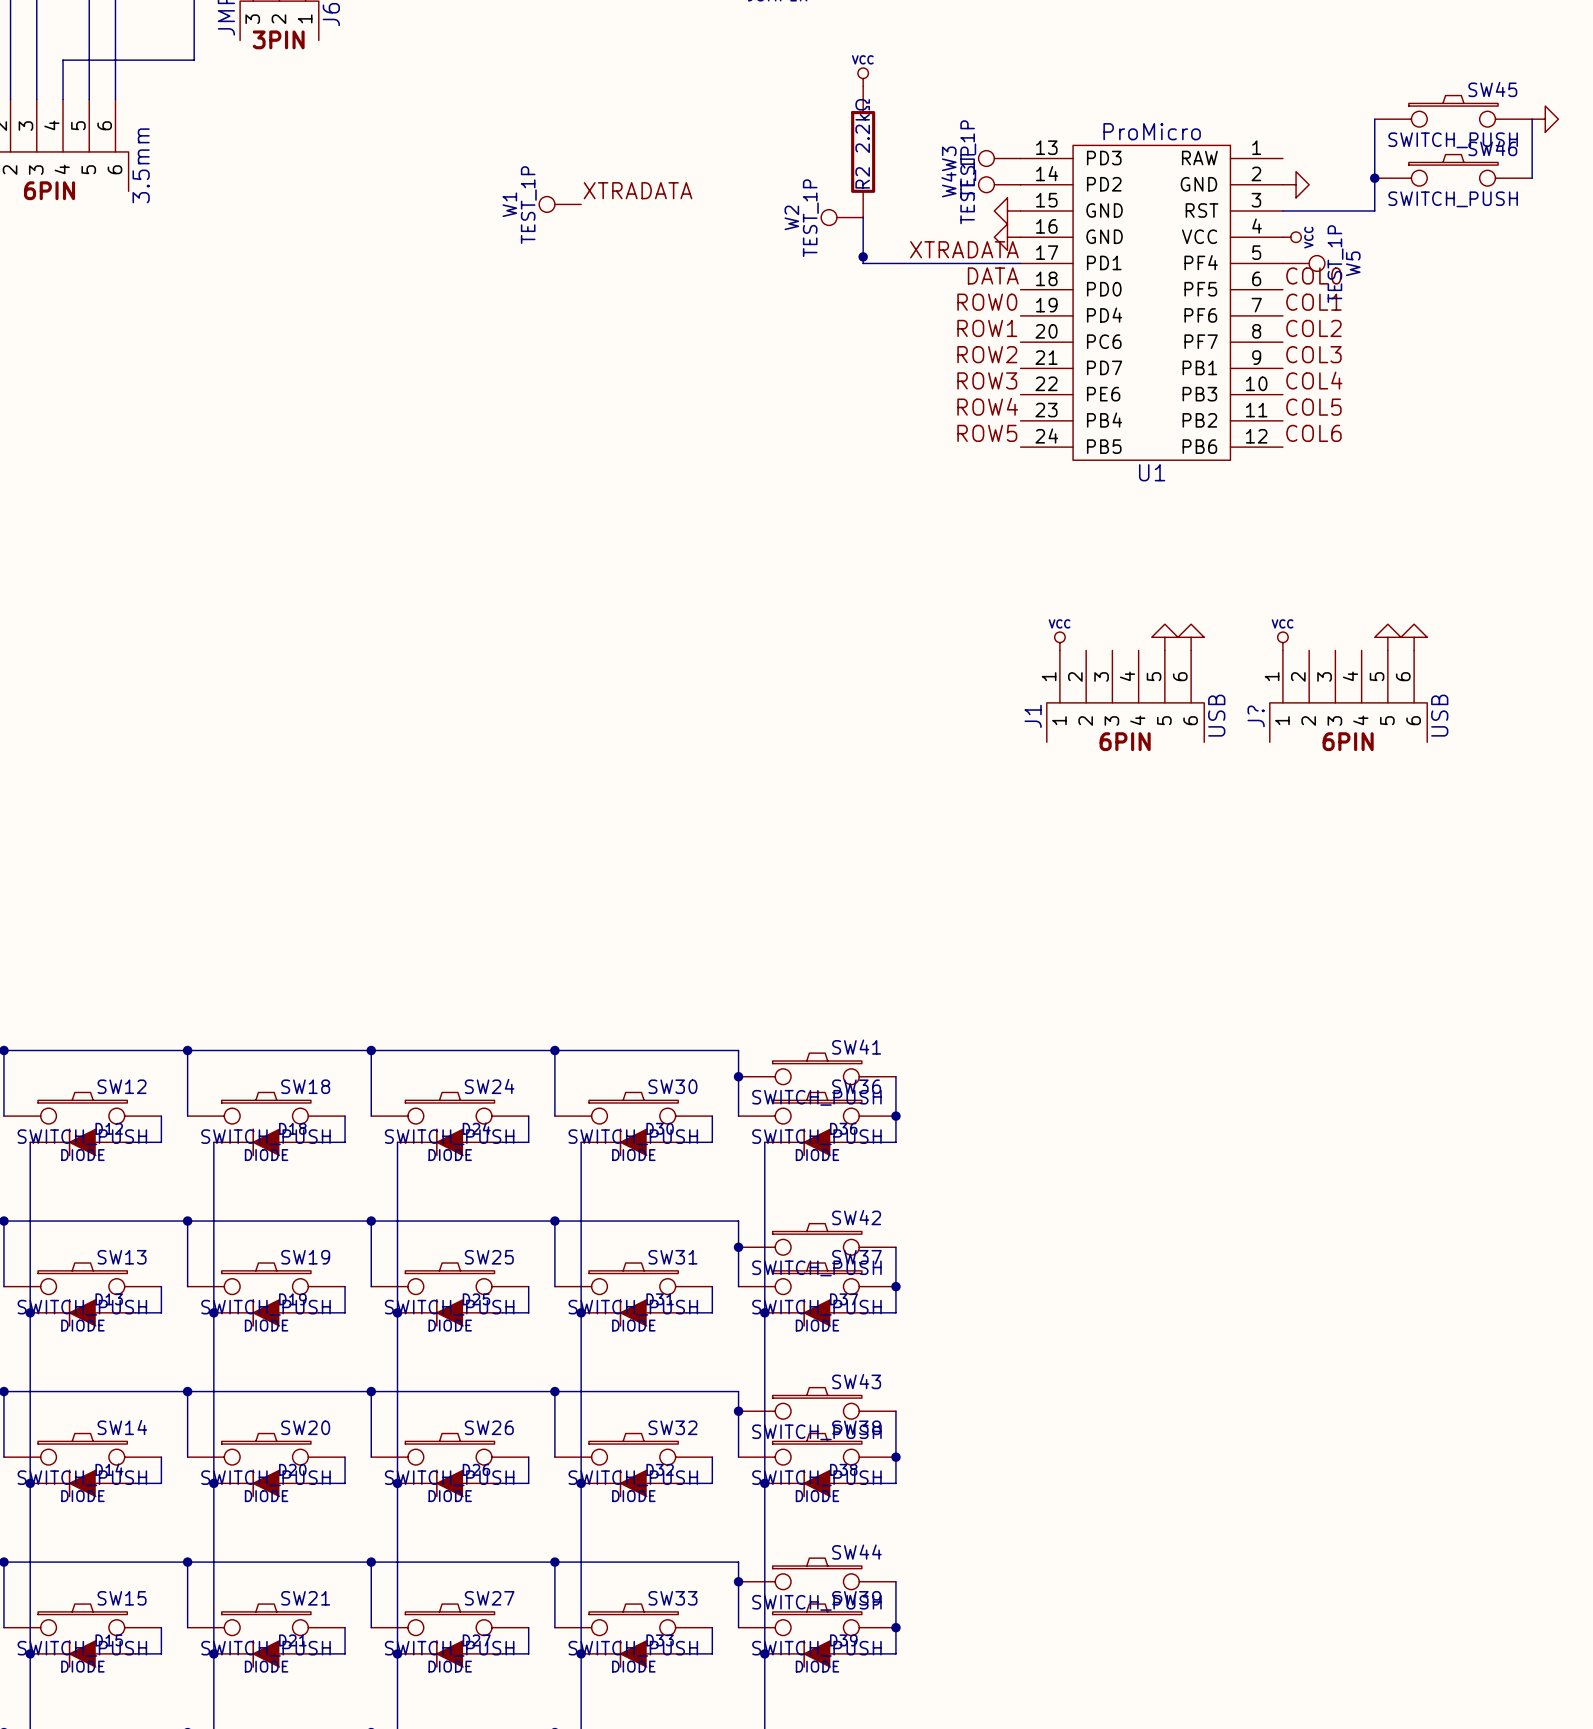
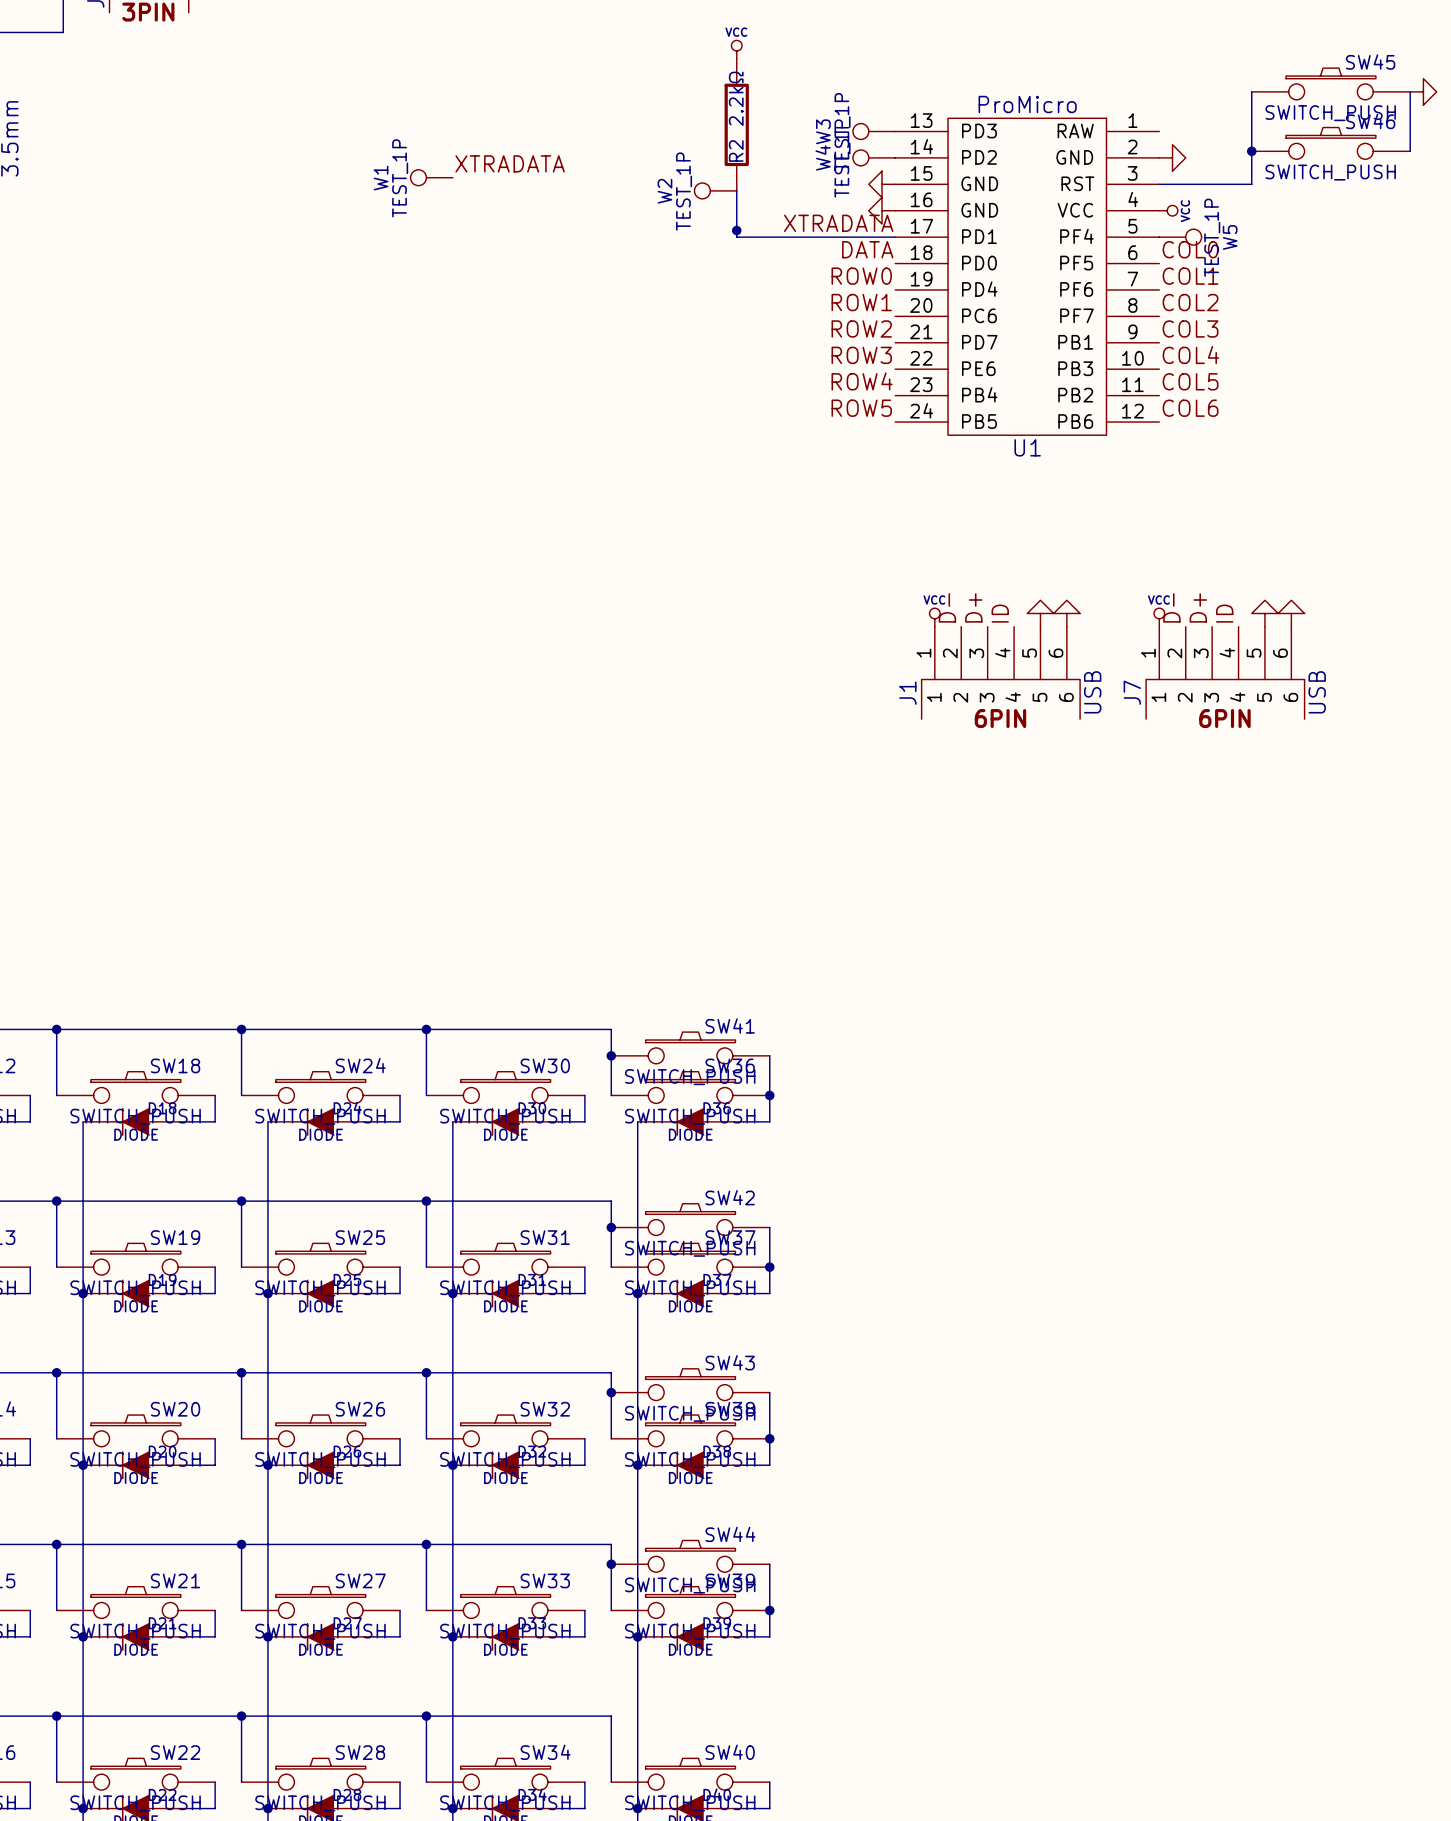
label: none -> D- (947, 607)
label: none -> D+ (973, 607)
label: none -> D- (1171, 607)
label: none -> D+ (1198, 607)
label: none -> ID (1000, 613)
label: none -> ID (1224, 613)
J? name: J? (1256, 716) -> J7 (1132, 692)

